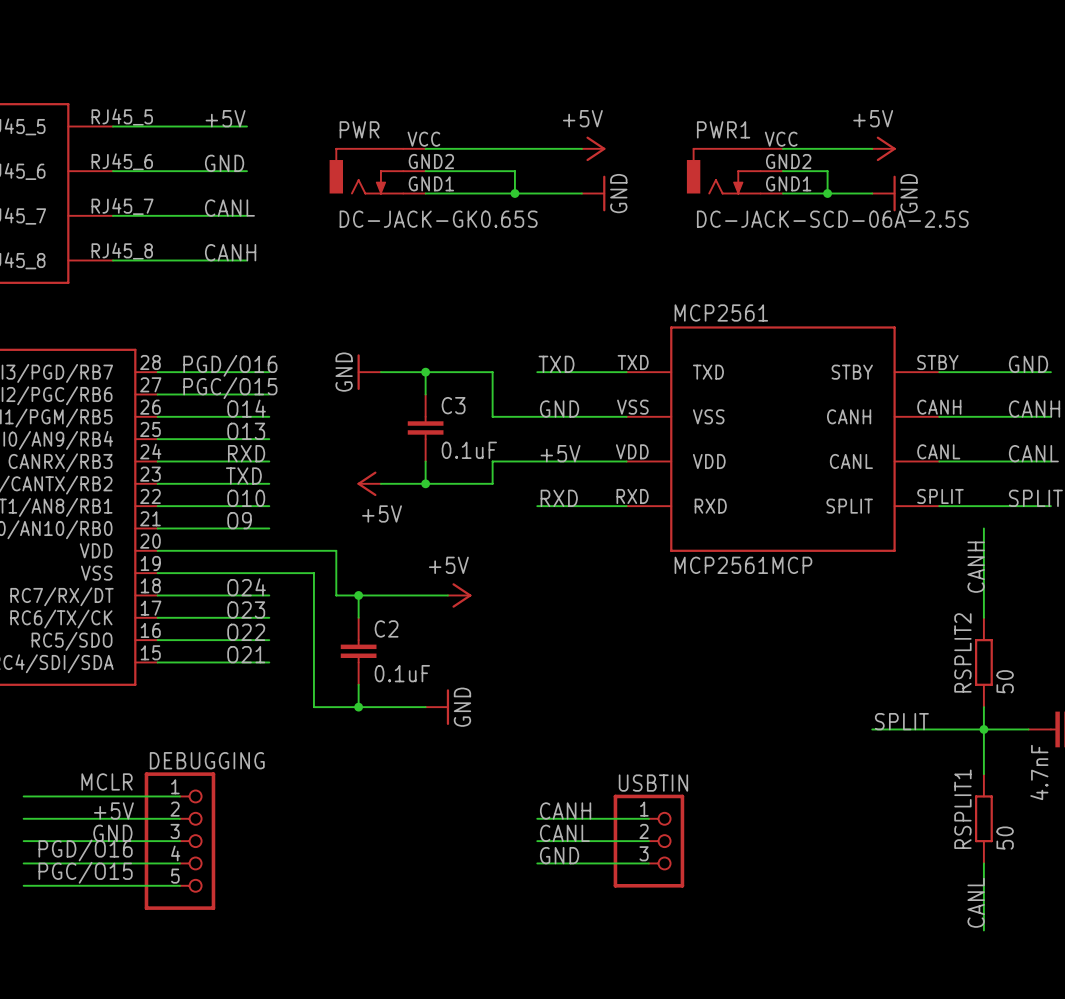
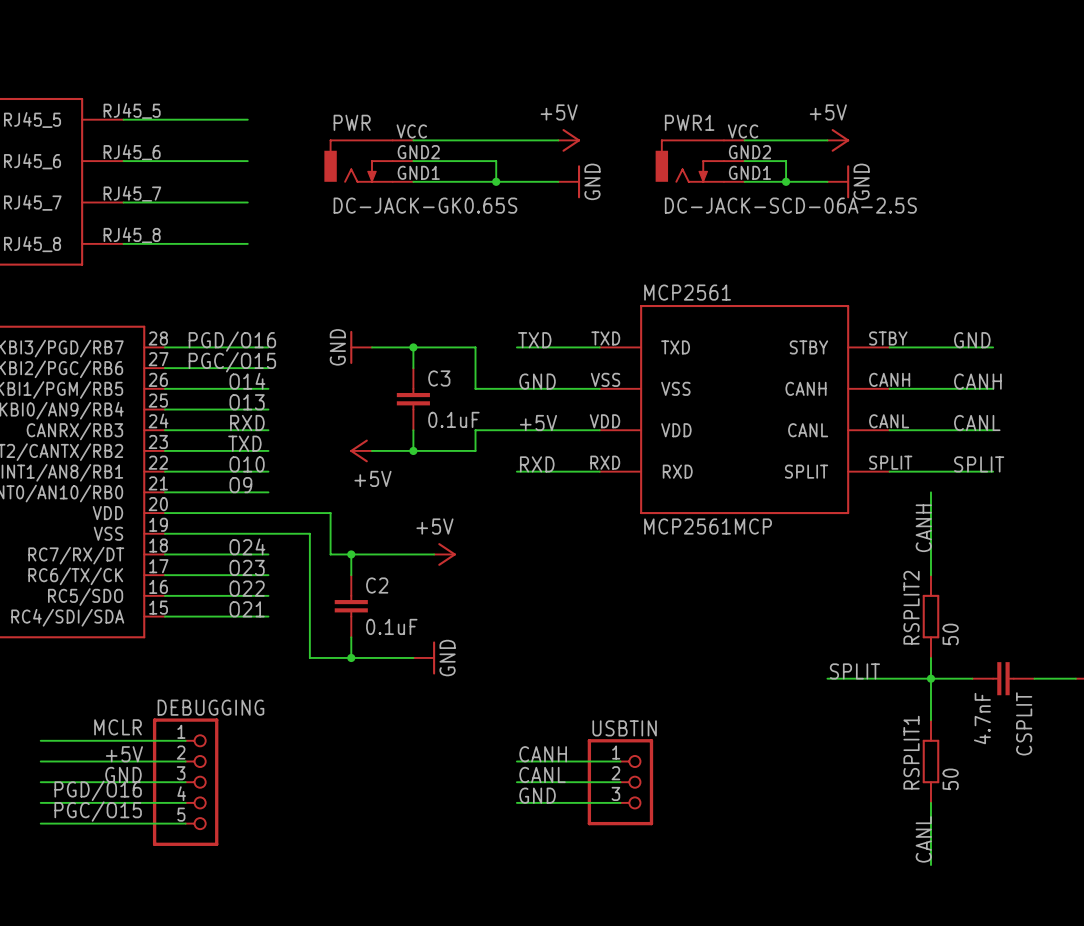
label: +5V (225, 118) -> none
label: GND (224, 163) -> none
label: CANL (229, 208) -> none
label: CANH (230, 252) -> none

